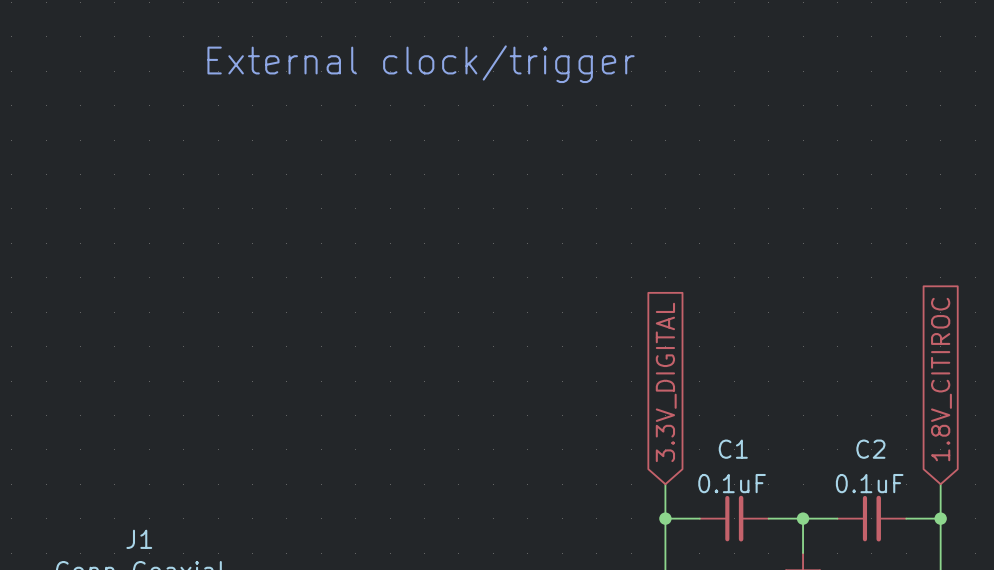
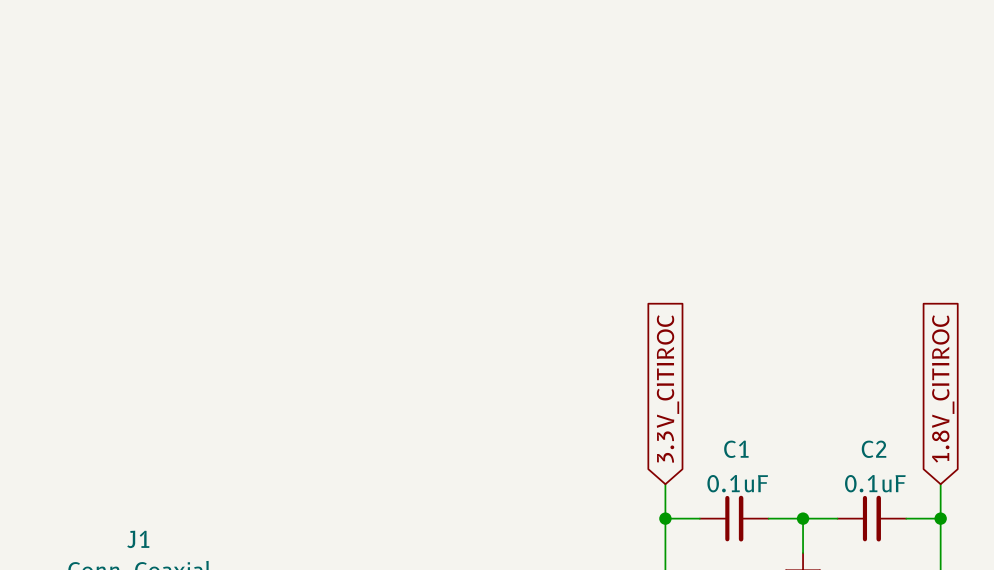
text: External clock/trigger (421, 64) -> none
global label: 3.3V_DIGITAL (666, 382) -> 3.3V_CITIROC (667, 388)

